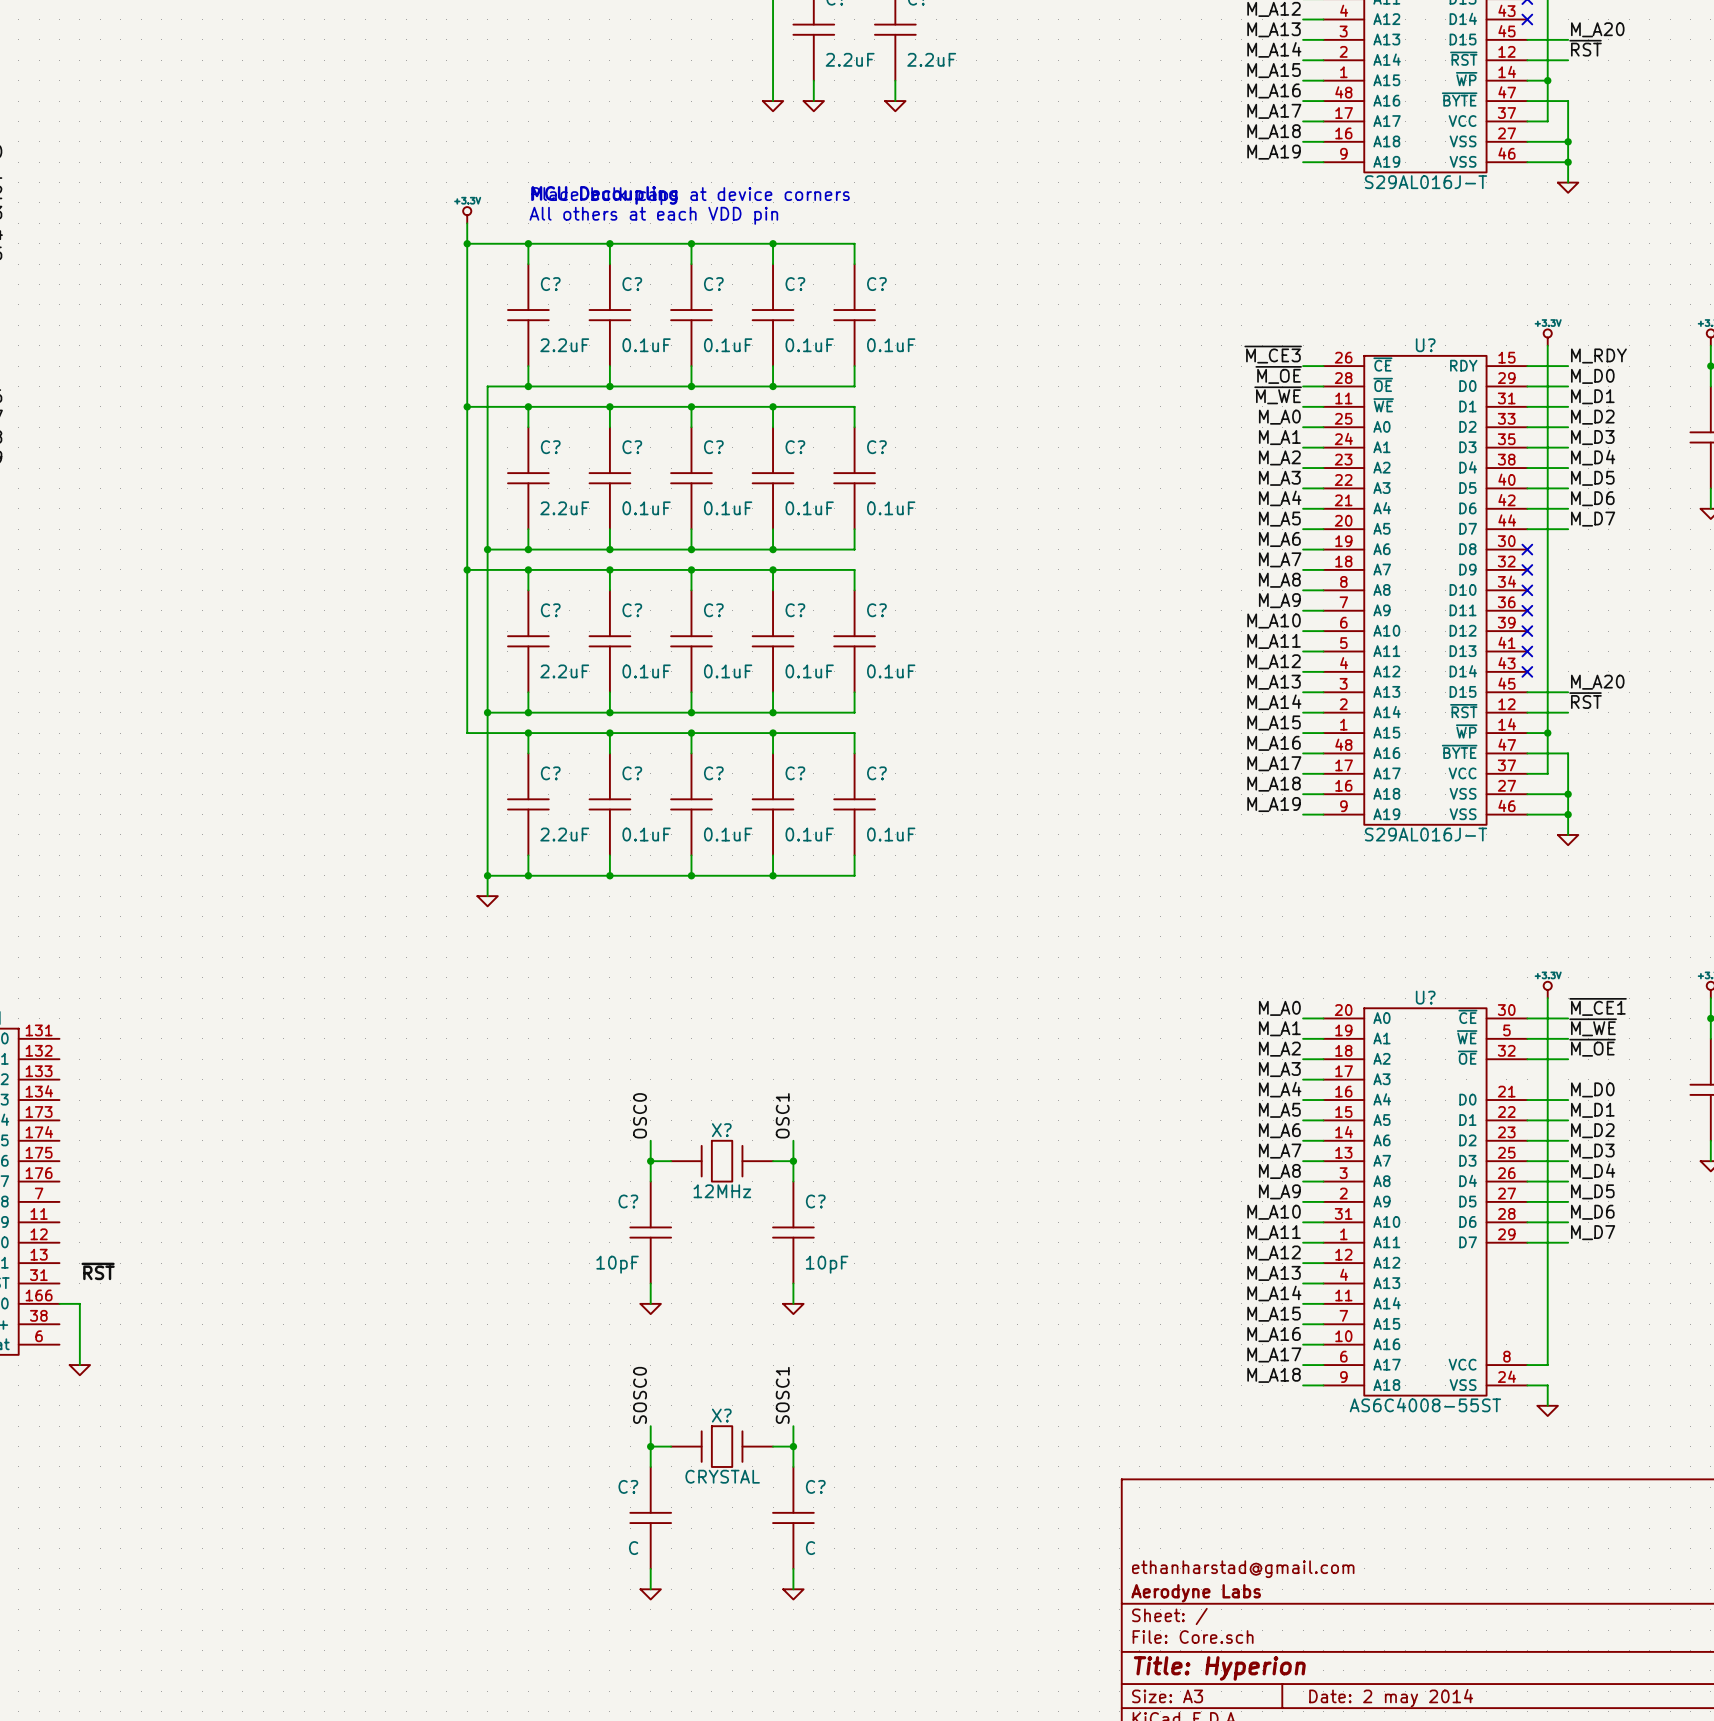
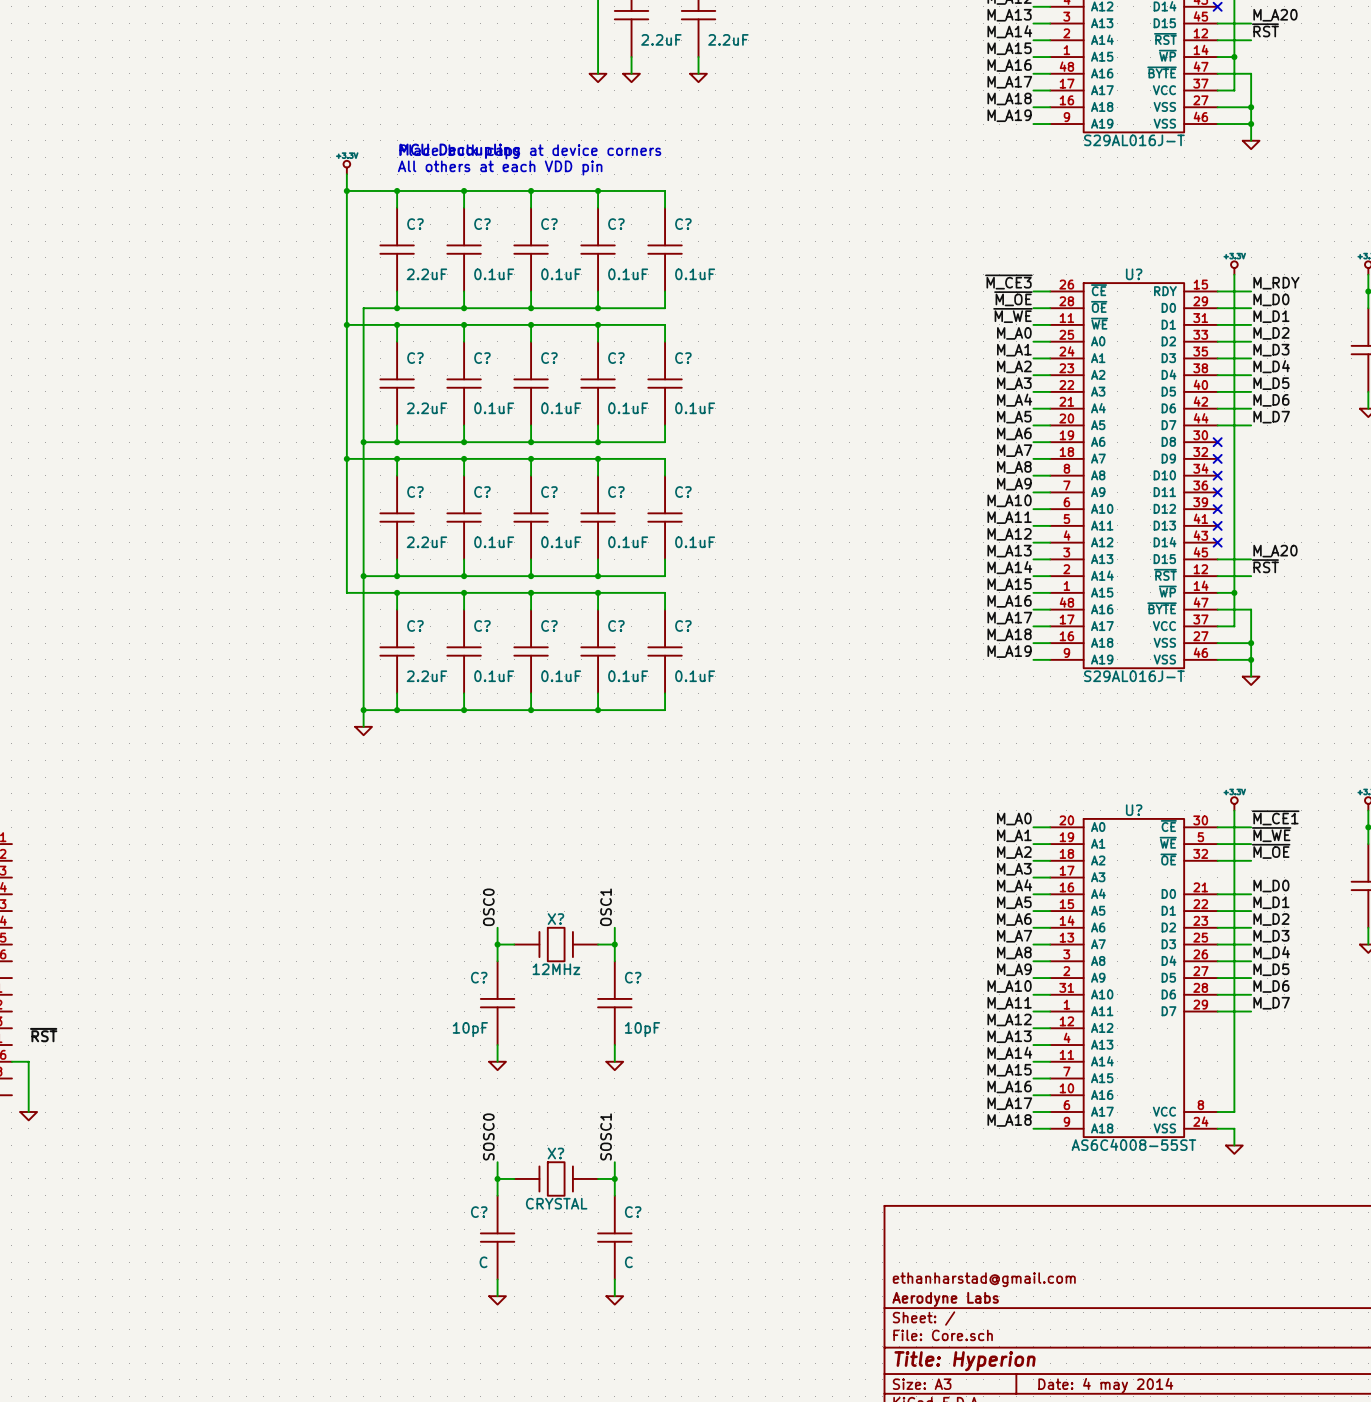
title block: Date: 2 may 2014 (1391, 1698) -> Date: 4 may 2014 (1105, 1385)

